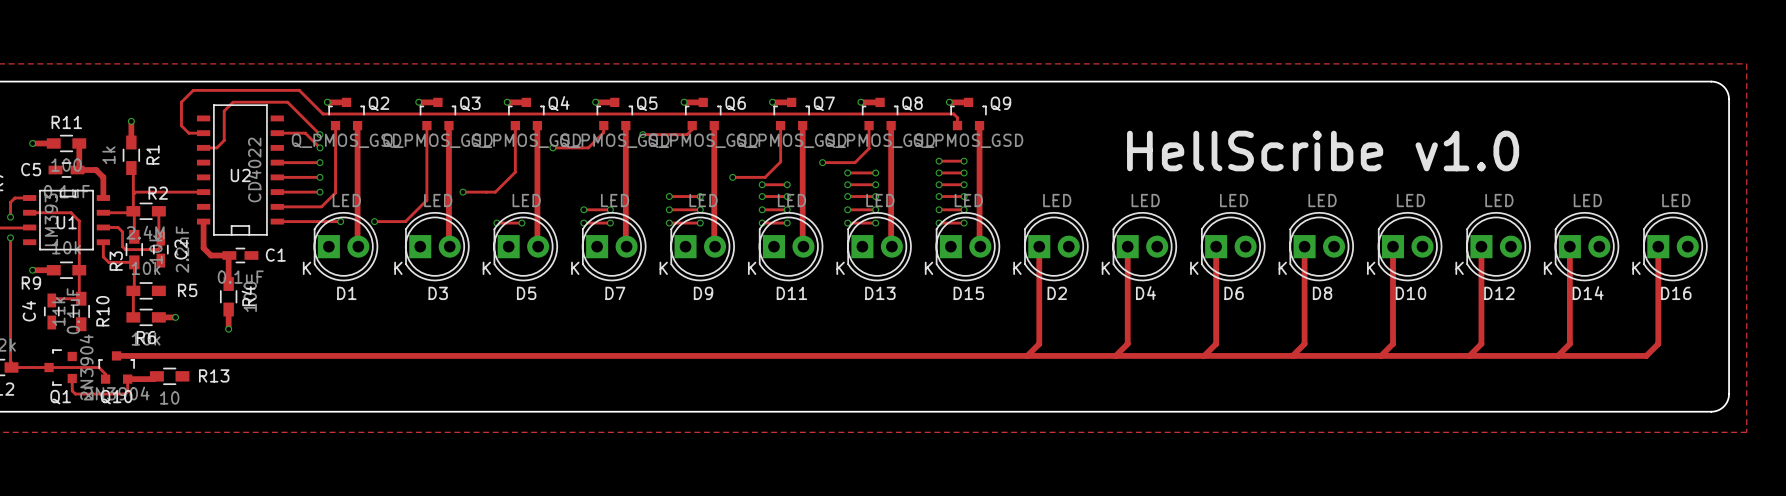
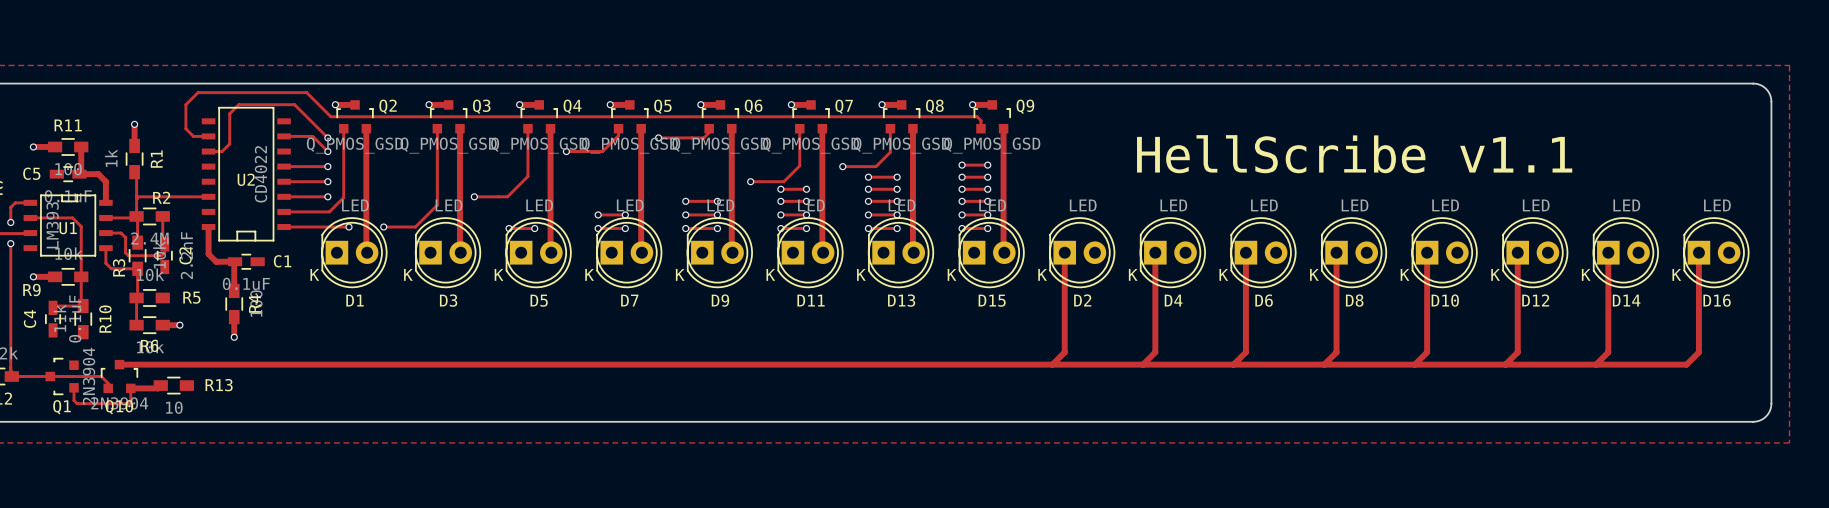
text: HellScribe v1.0 (1323, 151) -> HellScribe v1.1 (1354, 154)

